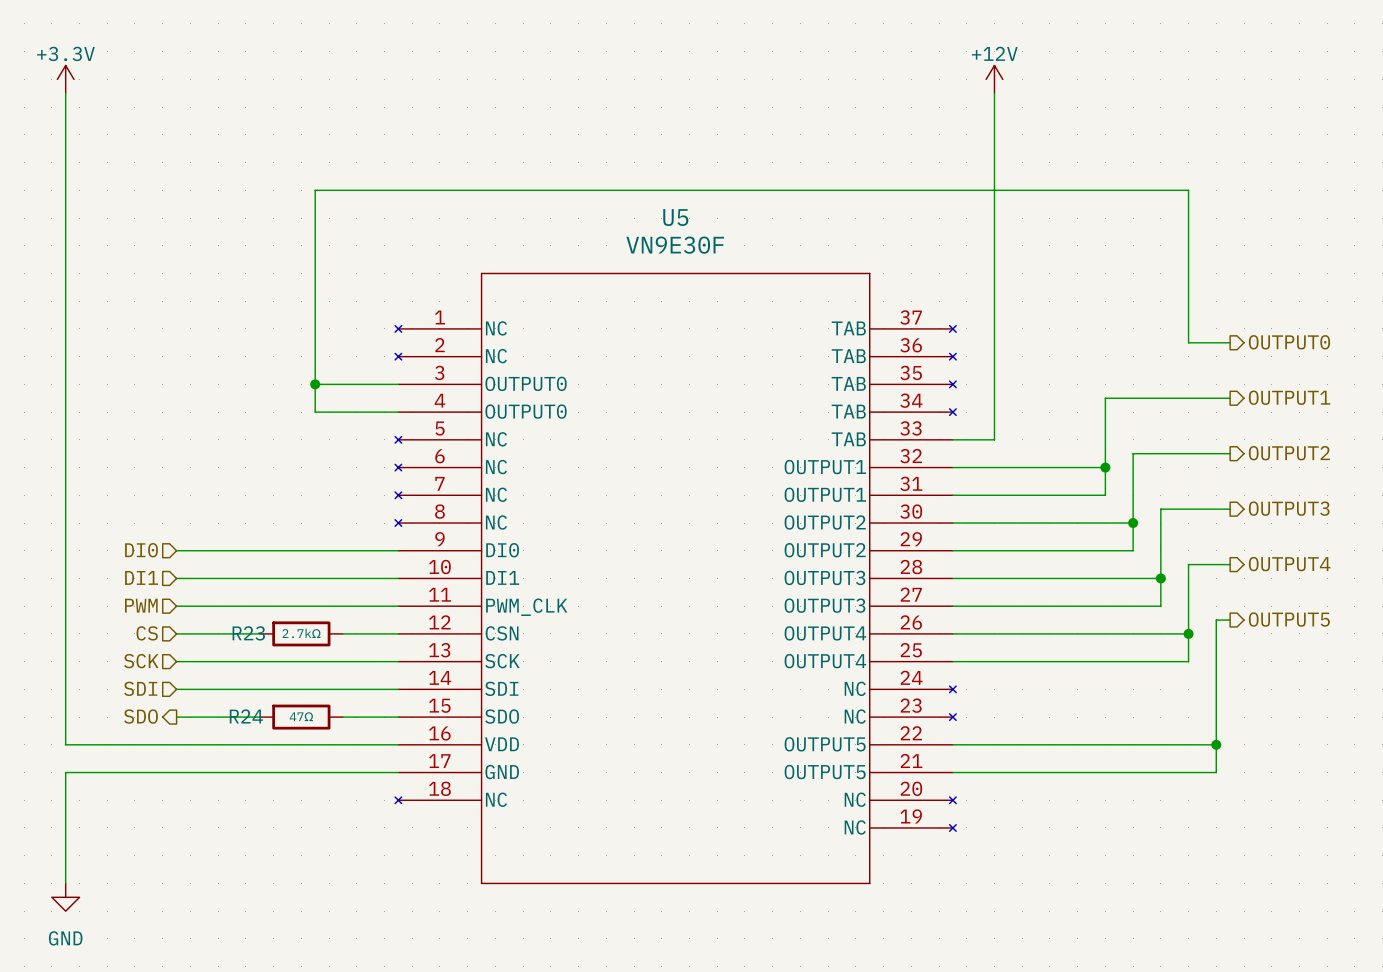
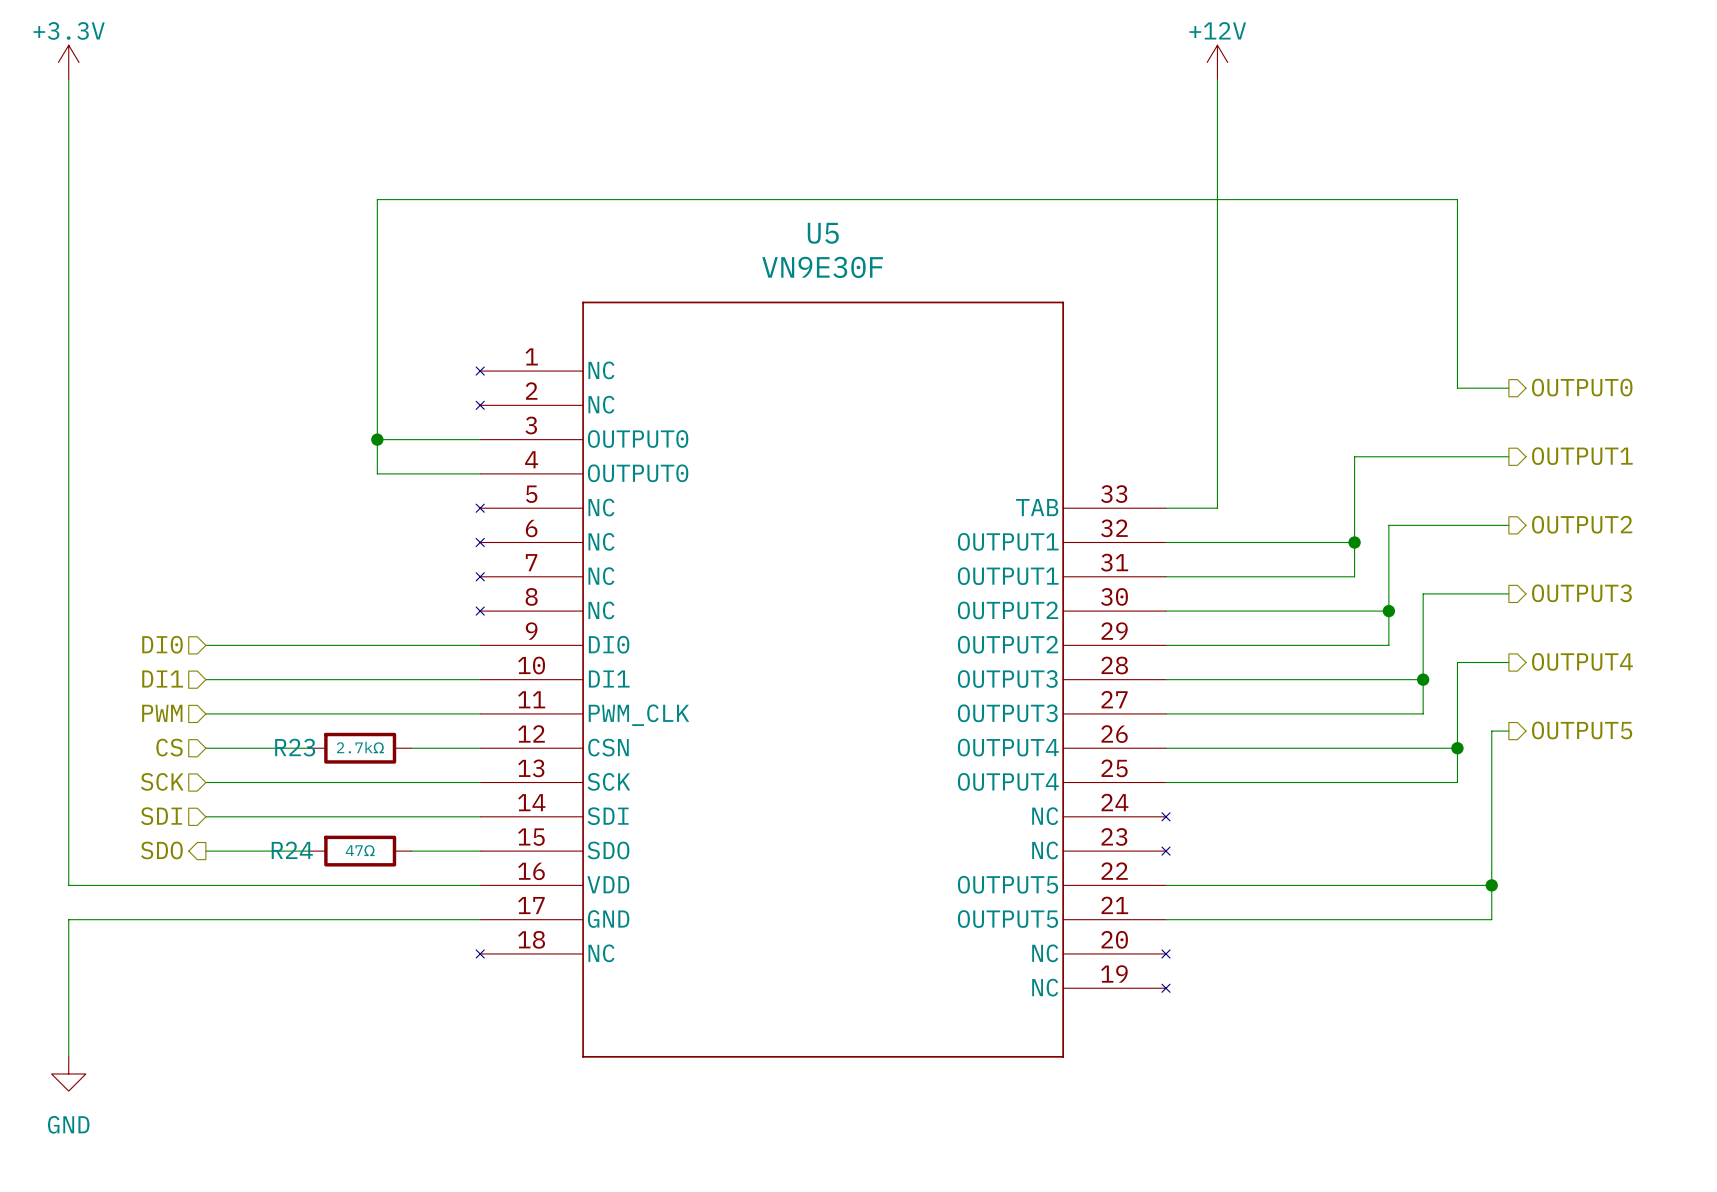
U5 symbol: [395, 272, 957, 885] -> [476, 301, 1171, 1058]

